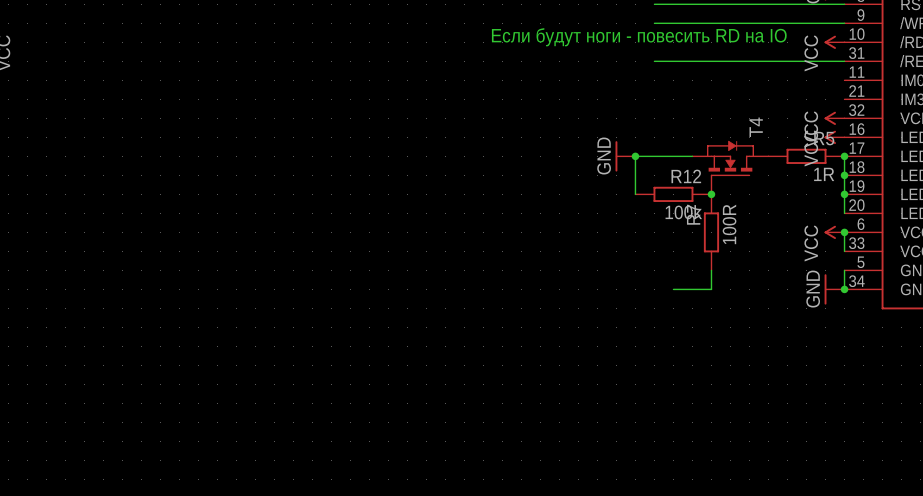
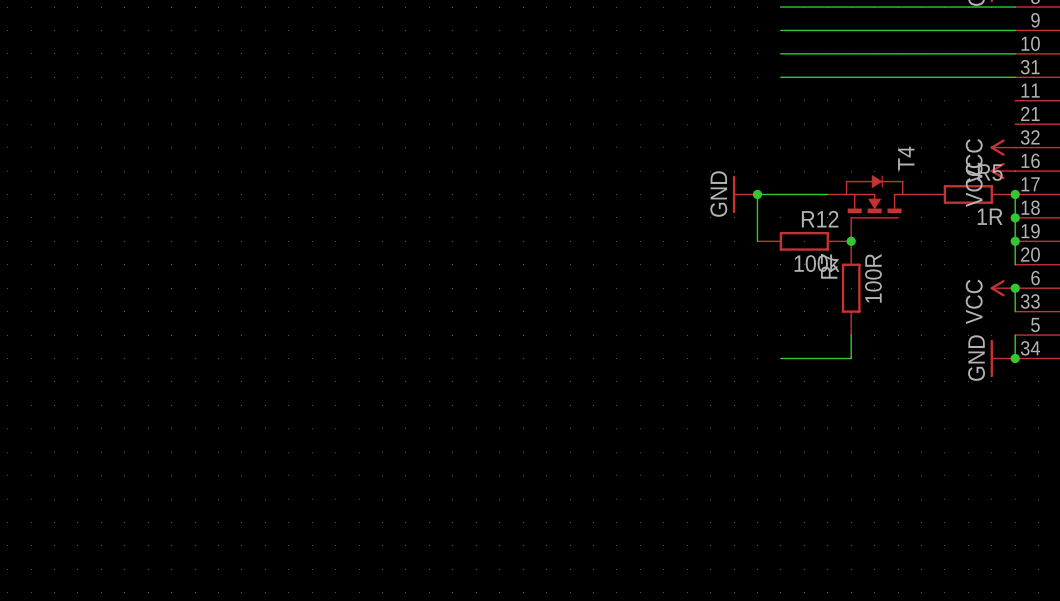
text: Если будут ноги - повесить RD на IO (639, 37) -> none
wire: none -> (780, 53) (1015, 53)
power symbol: VCC (834, 42) -> none
wire: none -> (780, 358) (804, 358)

